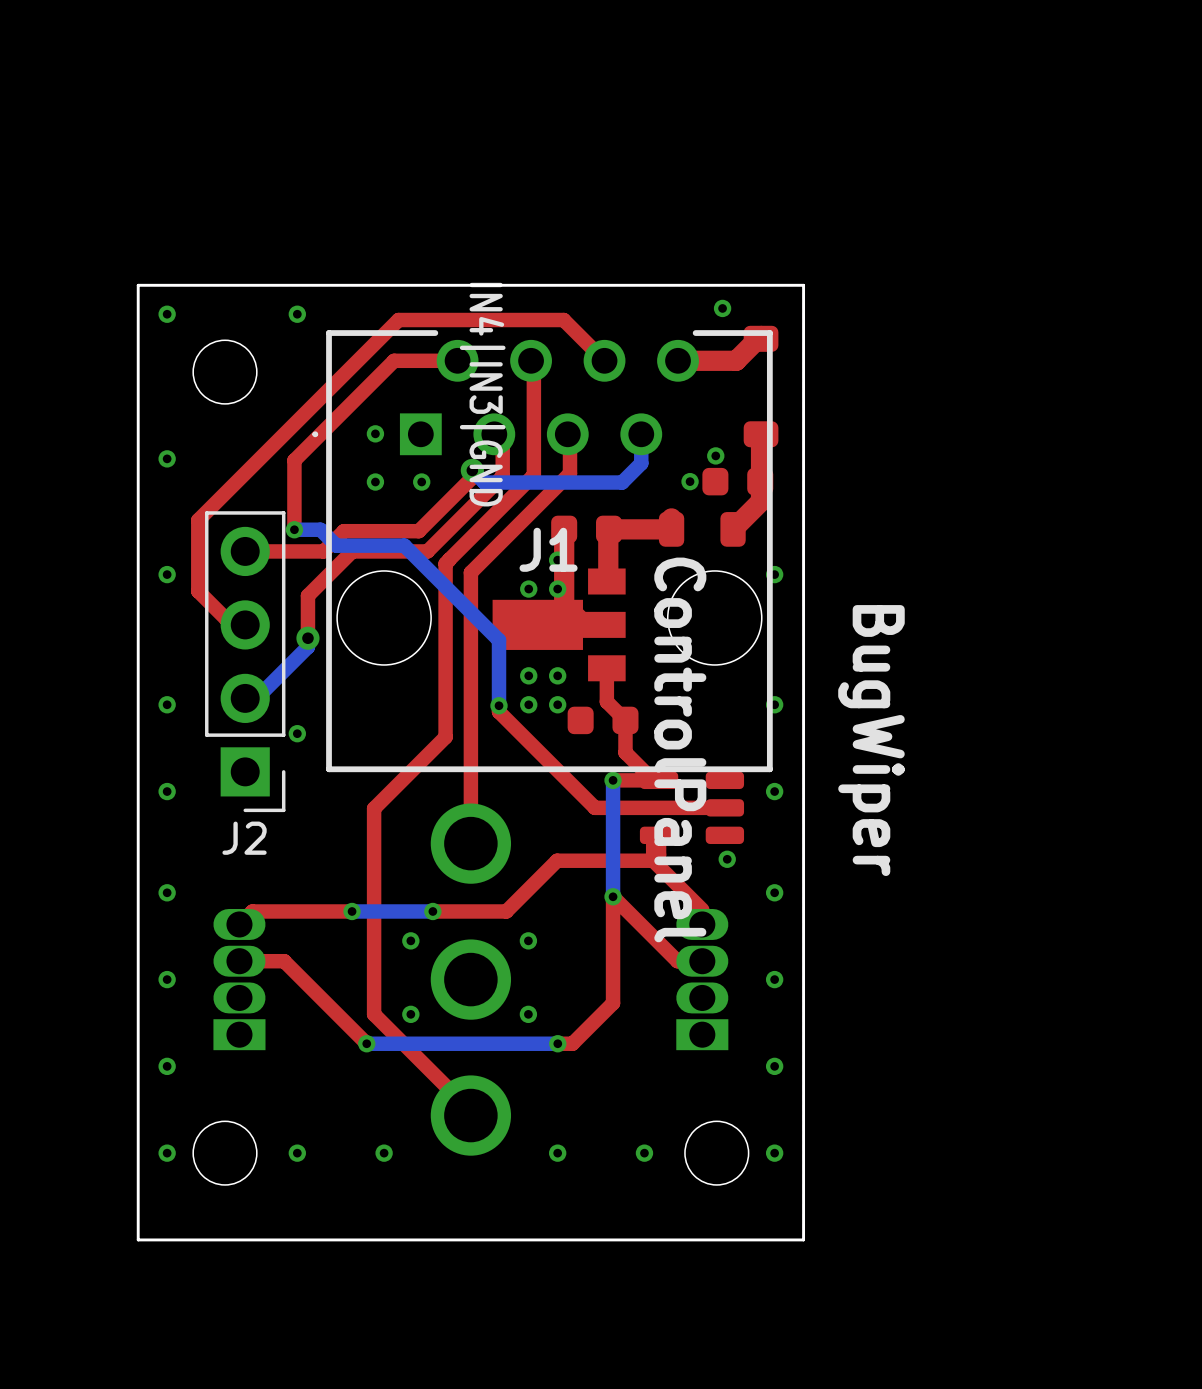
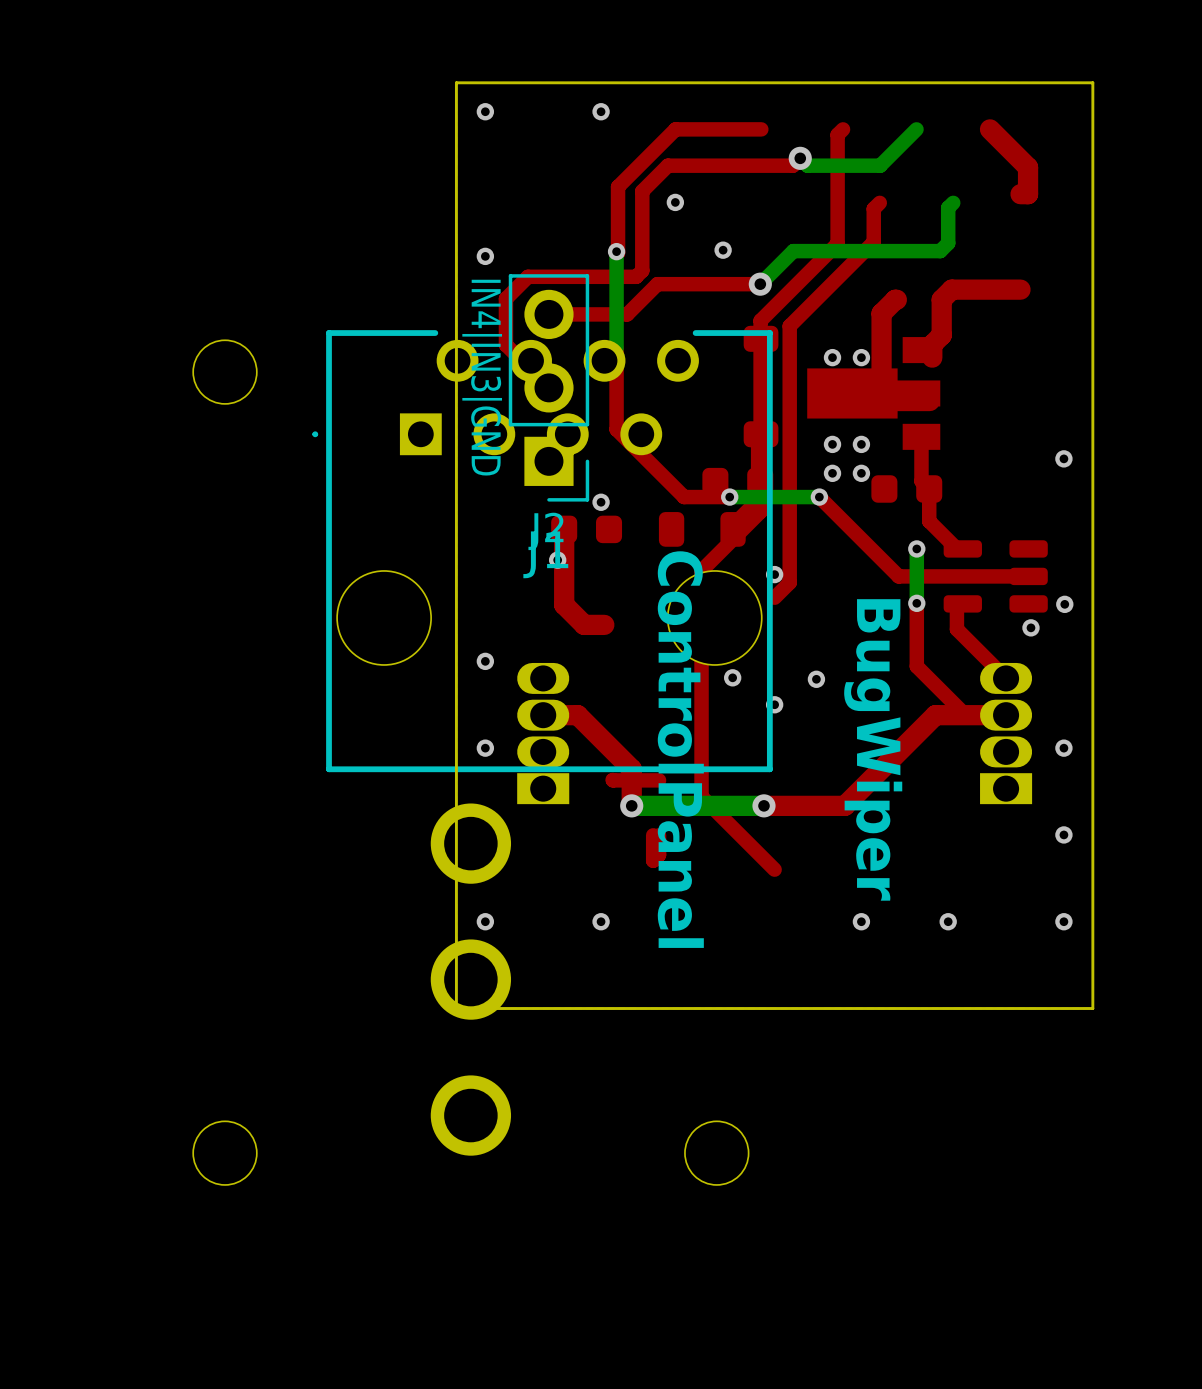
board edge: none -> (1092, 82) (456, 82) (456, 1008) (1092, 1008) (1092, 82)
via: none -> (485, 111)
via: none -> (601, 111)
top track: none -> (761, 129) (675, 129) (618, 186) (618, 253) (616, 251)
top track: none -> (843, 129) (837, 134) (837, 243) (760, 320) (760, 511) (701, 570) (701, 796) (774, 869)
bottom track: none -> (916, 129) (880, 165) (807, 165) (800, 158)
top track: none -> (990, 129) (1028, 167) (1028, 194) (1020, 194)
top track: none -> (800, 158) (792, 165) (667, 165) (642, 191) (642, 270) (636, 276) (527, 276) (505, 298) (505, 344) (548, 387)
via: none -> (800, 158)
via: none -> (675, 202)
top track: none -> (879, 202) (873, 208) (873, 242) (789, 326) (789, 582) (774, 597)
bottom track: none -> (953, 202) (948, 207) (948, 243) (940, 251) (793, 251) (760, 284)
via: none -> (723, 250)
bottom track: none -> (616, 251) (616, 348)
via: none -> (616, 251)
via: none -> (485, 256)
top track: none -> (760, 284) (657, 284) (627, 314) (543, 314)
via: none -> (760, 284)
board edge: (803, 285) (138, 285) (138, 1239) (803, 1239) (803, 285) -> none
top track: none -> (1020, 289) (951, 289) (941, 299) (941, 335) (932, 344) (932, 357)
top track: none -> (896, 299) (881, 313) (881, 387) (895, 401) (929, 401)
via: (722, 308) -> none
via: (167, 314) -> none
via: (297, 314) -> none
top track: (761, 335) (736, 360) (686, 360) -> none
top track: none -> (616, 348) (616, 429) (684, 497) (729, 497)
via: none -> (832, 357)
via: none -> (861, 357)
top track: (457, 360) (394, 360) (294, 460) (294, 529) -> none
top track: (539, 360) (533, 366) (533, 475) (449, 559) -> none
top track: (604, 360) (563, 320) (398, 320) (198, 520) (198, 591) (226, 619) (245, 619) -> none
via: (375, 433) -> none
top track: (494, 434) (502, 442) (502, 476) (427, 551) (352, 551) (307, 595) (307, 638) -> none
top track: (576, 434) (570, 440) (570, 473) (470, 572) (470, 829) -> none
bottom track: (635, 434) (641, 434) (641, 463) (622, 482) (484, 482) (472, 470) -> none
top track: none -> (921, 436) (921, 481) (929, 488) (929, 521) (956, 548)
via: none -> (832, 444)
via: none -> (861, 444)
via: (715, 455) -> none
via: (167, 458) -> none
via: none -> (1063, 458)
top track: (472, 470) (472, 477) (418, 531) (343, 531) (323, 551) (245, 551) -> none
via: (472, 470) -> none
via: none -> (832, 473)
via: none -> (861, 473)
via: (690, 481) -> none
via: (375, 482) -> none
via: (421, 482) -> none
via: none -> (729, 497)
top track: none -> (819, 497) (898, 576) (1028, 576)
bottom track: none -> (819, 497) (729, 497)
via: none -> (819, 497)
via: none -> (601, 502)
J2 footprint: [205, 511, 286, 813] -> [508, 274, 590, 502]
top track: (671, 518) (671, 529) (609, 529) (606, 581) -> none
bottom track: (294, 529) (320, 529) (336, 545) (404, 545) (499, 640) (499, 705) -> none
via: (294, 529) -> none
bottom track: none -> (916, 548) (917, 604)
via: none -> (916, 548)
top track: (449, 560) (445, 563) (445, 737) (374, 808) (374, 1014) (460, 1101) (470, 1101) -> none
via: (167, 574) -> none
via: (528, 589) -> none
via: (557, 589) -> none
top track: none -> (916, 603) (916, 666) (965, 715) (1006, 715) (935, 715) (844, 805) (763, 805)
via: none -> (916, 603)
top track: none -> (956, 603) (956, 629) (1006, 678)
via: none -> (1064, 604)
part position: (559, 624) -> (873, 393)
via: none -> (1030, 627)
bottom track: (307, 638) (307, 646) (256, 698) (245, 698) -> none
via: (307, 638) -> none
via: none -> (485, 661)
top track: (606, 668) (606, 701) (625, 720) (625, 752) (653, 780) -> none
via: (528, 675) -> none
via: (557, 675) -> none
via: none -> (732, 677)
via: none -> (816, 679)
via: (167, 704) -> none
via: (528, 704) -> none
via: (557, 704) -> none
top track: (499, 705) (499, 711) (594, 807) (724, 807) -> none
via: (499, 705) -> none
top track: none -> (543, 715) (577, 715) (631, 769) (631, 805)
part position: (603, 720) -> (906, 488)
via: (297, 733) -> none
part: none -> (543, 733)
part: none -> (1006, 733)
via: none -> (485, 748)
via: none -> (1063, 748)
bottom track: (613, 780) (613, 896) -> none
via: (613, 780) -> none
via: (167, 791) -> none
via position: (774, 791) -> (763, 805)
via: none -> (631, 805)
bottom track: none -> (763, 805) (631, 805)
part position: (691, 807) -> (995, 576)
via: none -> (1063, 834)
via: (727, 859) -> none
via: (167, 892) -> none
via: (774, 892) -> none
via position: (613, 896) -> (601, 921)
top track: (702, 909) (653, 860) (557, 860) (506, 911) (432, 911) -> none
top track: (352, 911) (252, 911) (239, 924) -> none
via: (352, 911) -> none
bottom track: (432, 911) (352, 911) -> none
via: (432, 911) -> none
via: none -> (485, 921)
via: none -> (861, 921)
via: none -> (948, 921)
via: none -> (1063, 921)
via: (410, 940) -> none
via: (528, 940) -> none
top track: (239, 961) (284, 961) (366, 1043) -> none
top track: (702, 961) (677, 961) (613, 896) (613, 1003) (572, 1043) (557, 1043) -> none
via: (167, 979) -> none
part: (239, 979) -> none
part: (702, 979) -> none
via: (774, 979) -> none
via: (410, 1014) -> none
via: (528, 1014) -> none
via: (366, 1043) -> none
bottom track: (557, 1043) (366, 1043) -> none
via: (557, 1043) -> none
via: (167, 1066) -> none
via: (774, 1066) -> none
via: (167, 1153) -> none
via: (297, 1153) -> none
via: (384, 1153) -> none
via: (557, 1153) -> none
via: (644, 1153) -> none
via: (774, 1153) -> none

